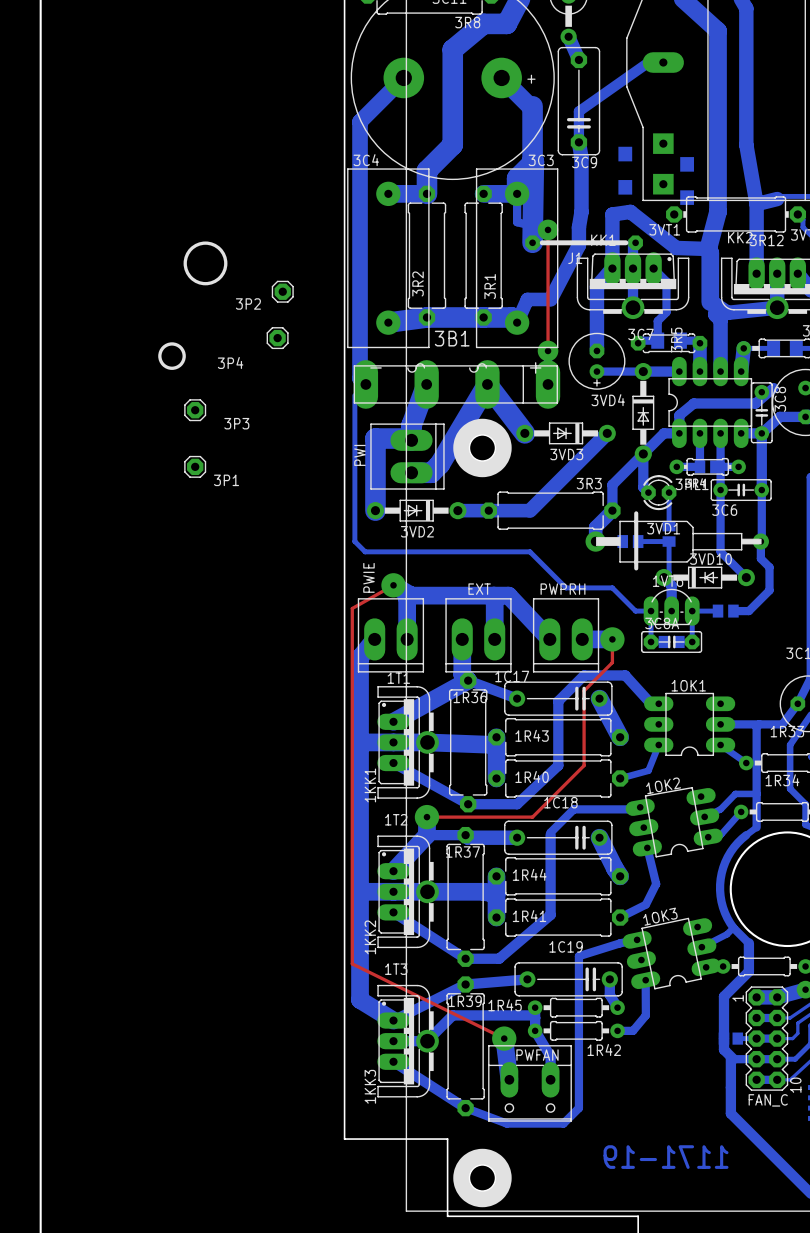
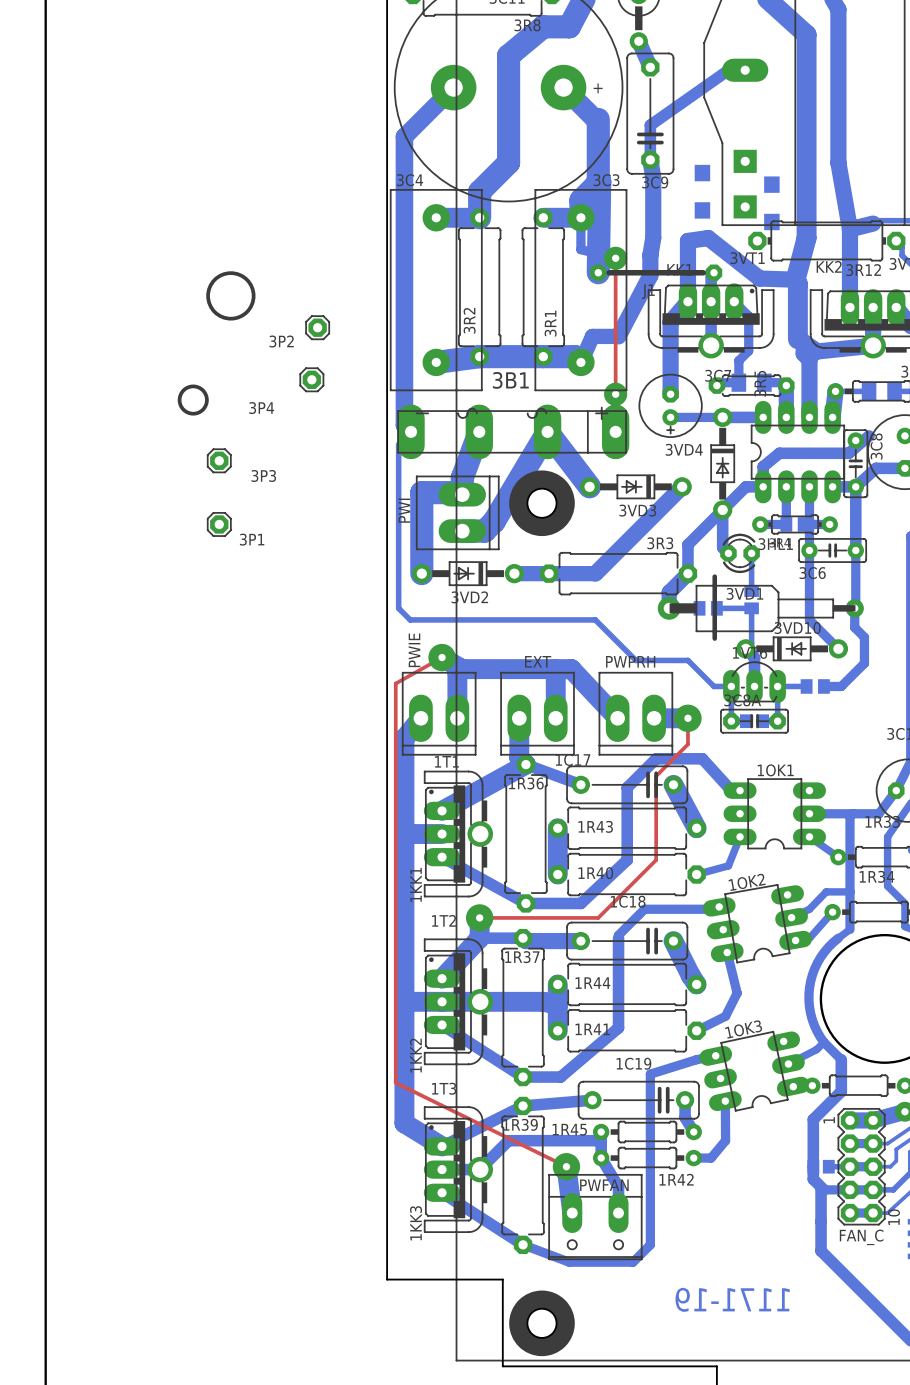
bottom track: (393, 742) (496, 745) -> none

